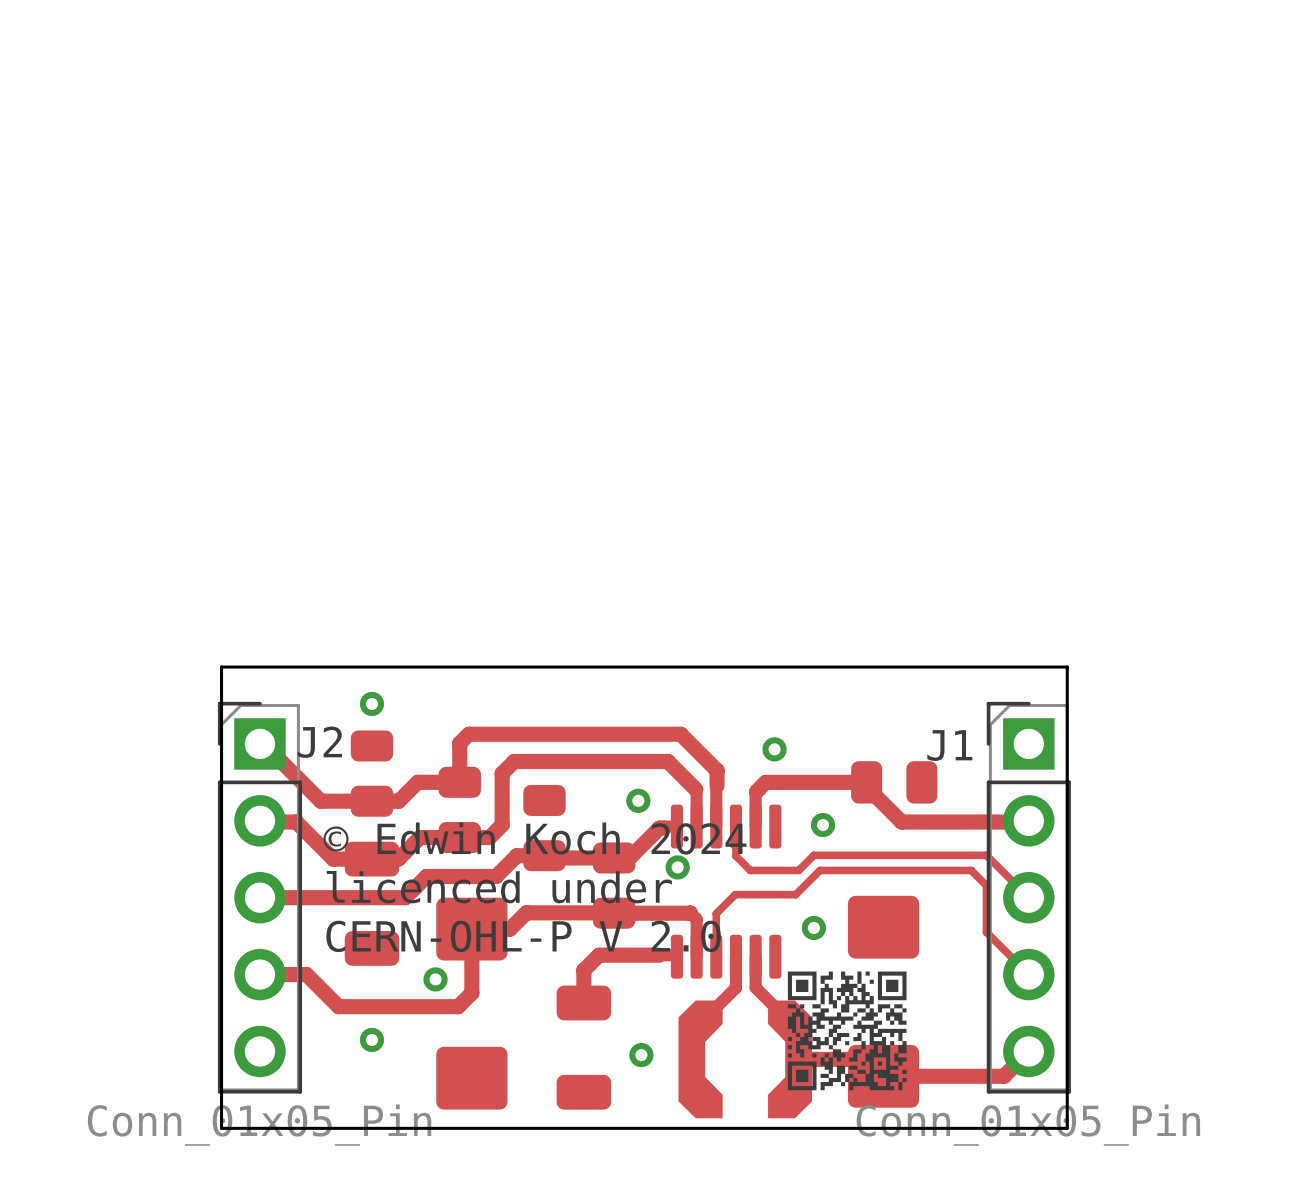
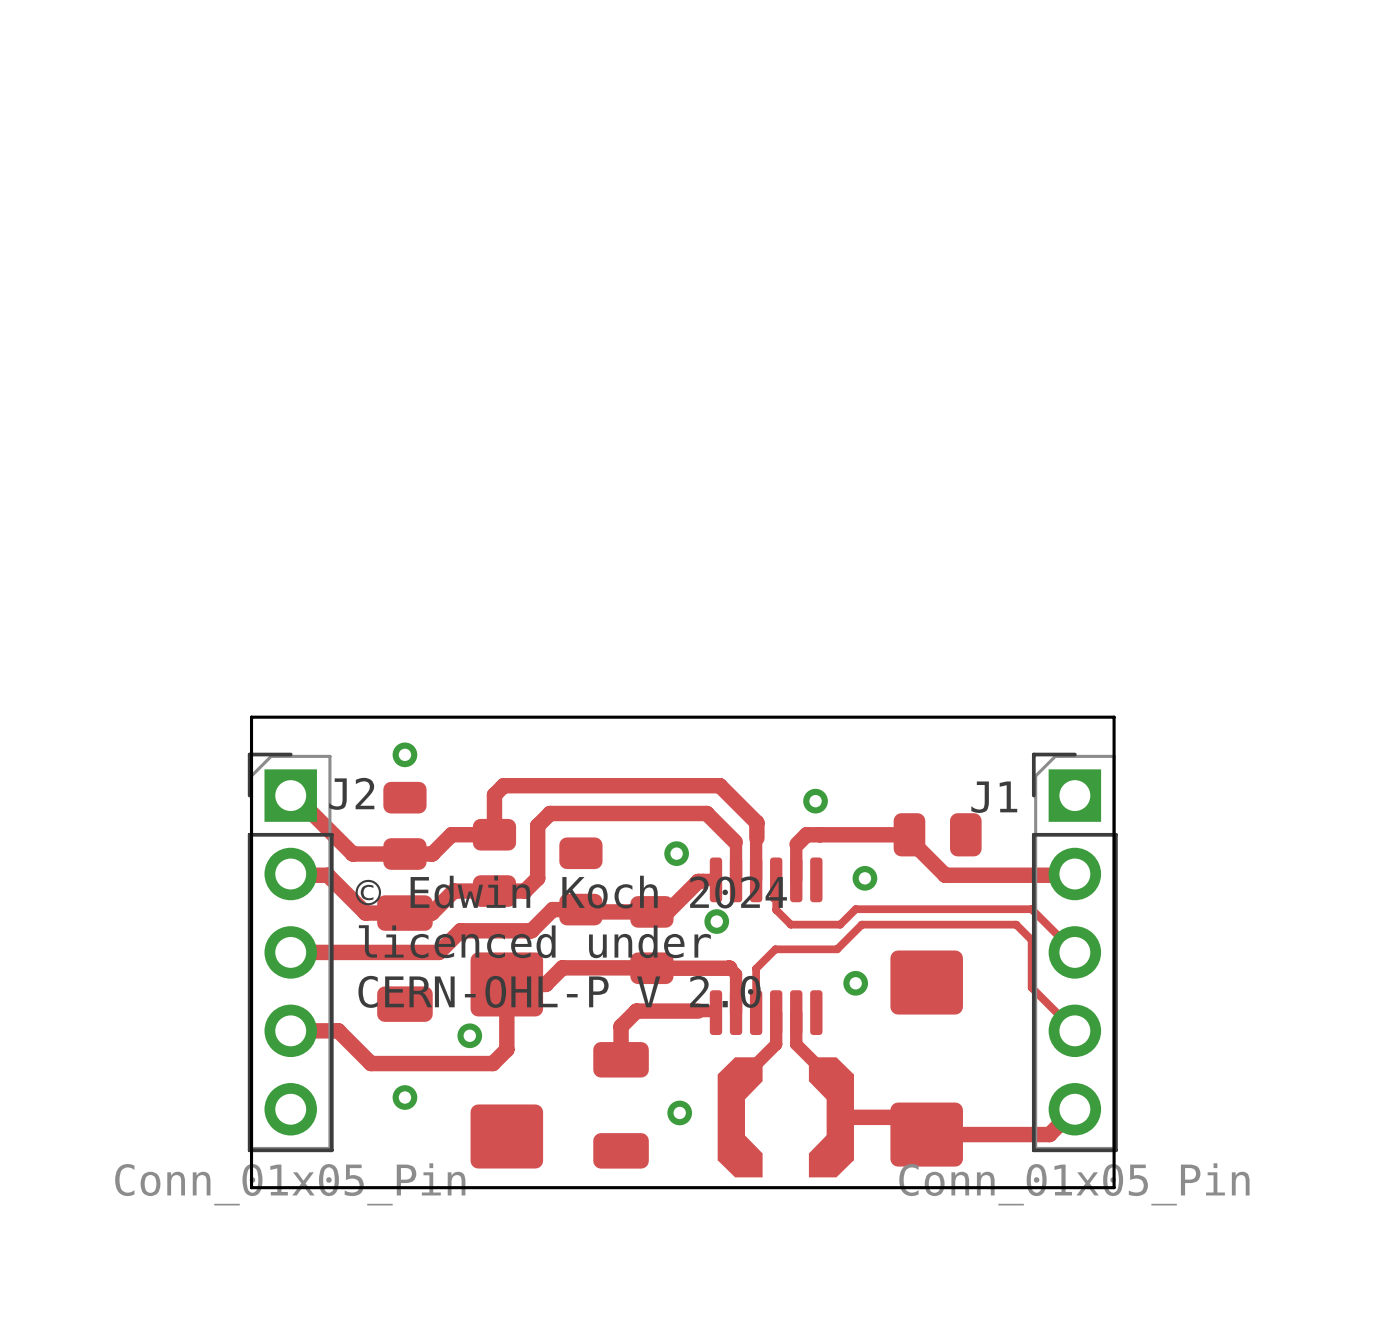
drawing: [787, 971, 907, 1091] -> none

